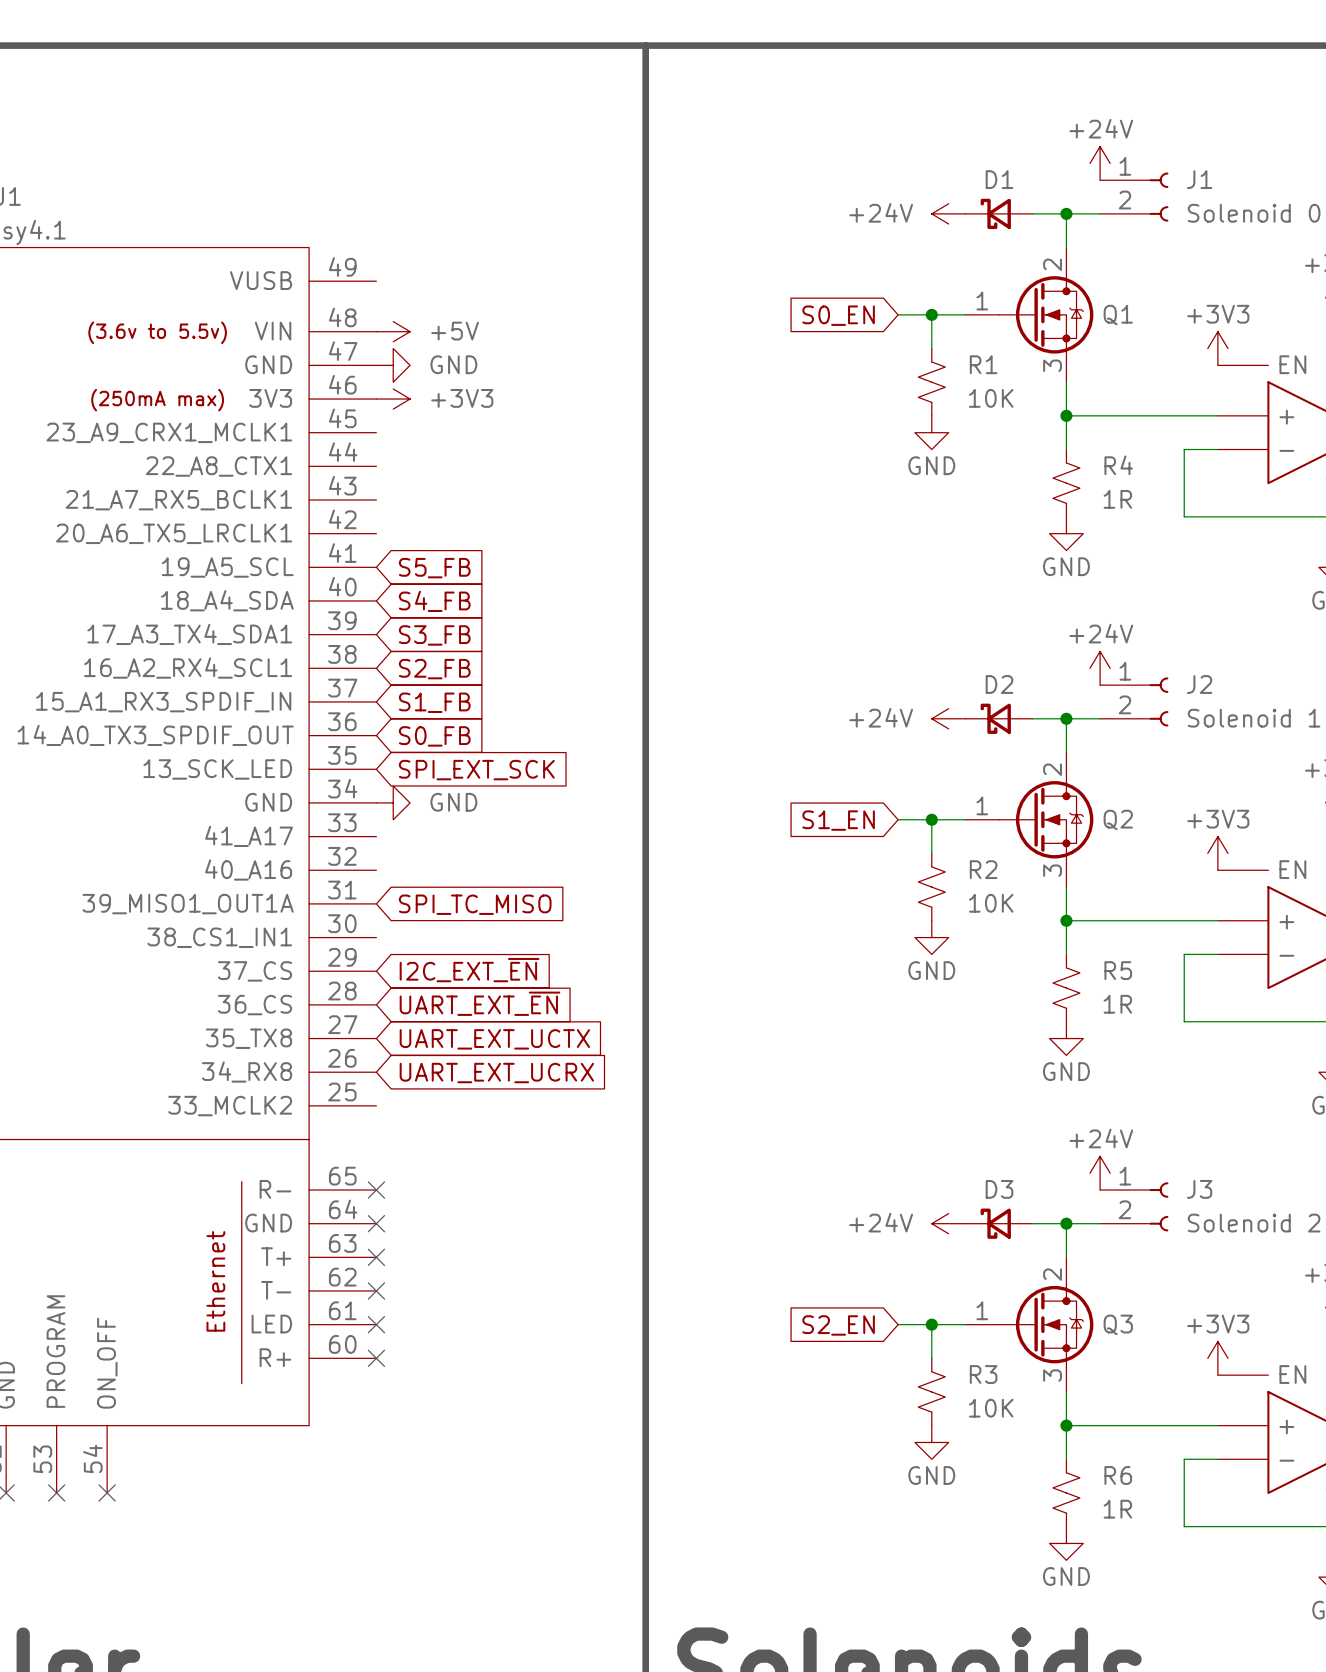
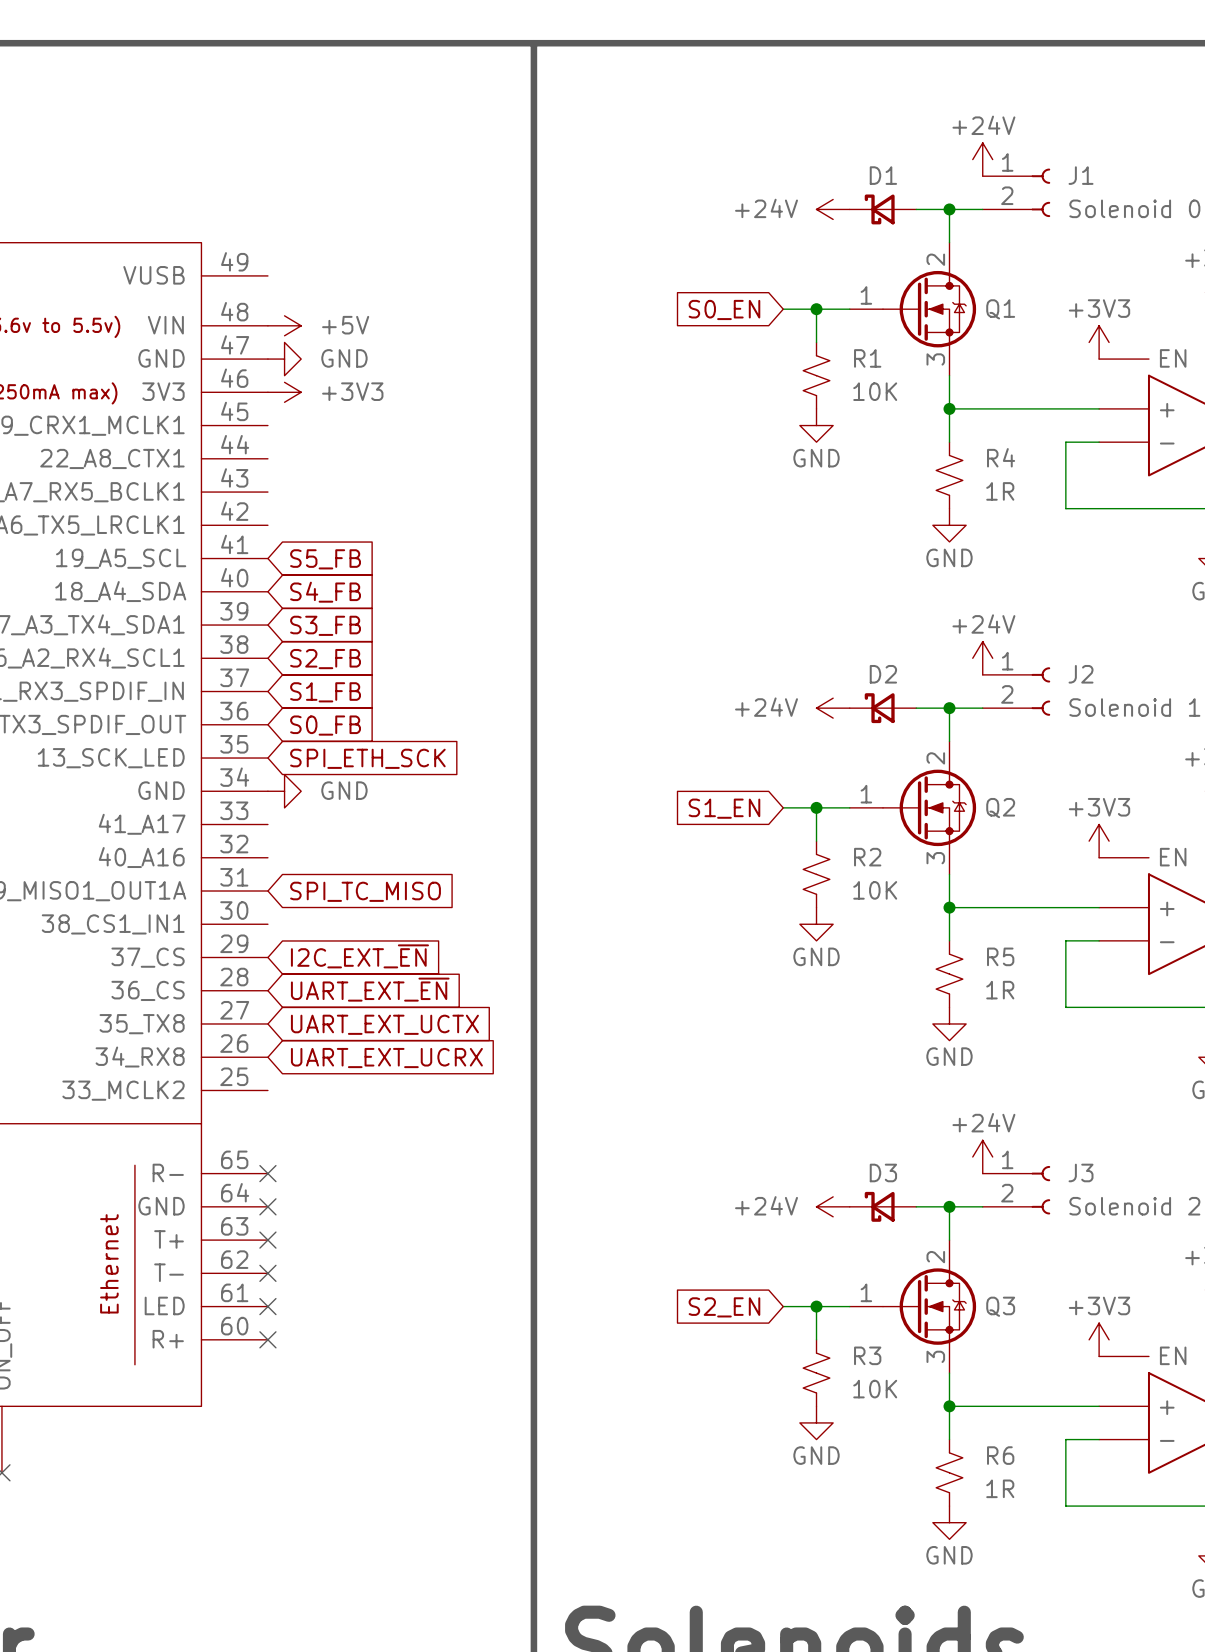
global label: SPI_EXT_SCK (476, 770) -> SPI_ETH_SCK (367, 758)

